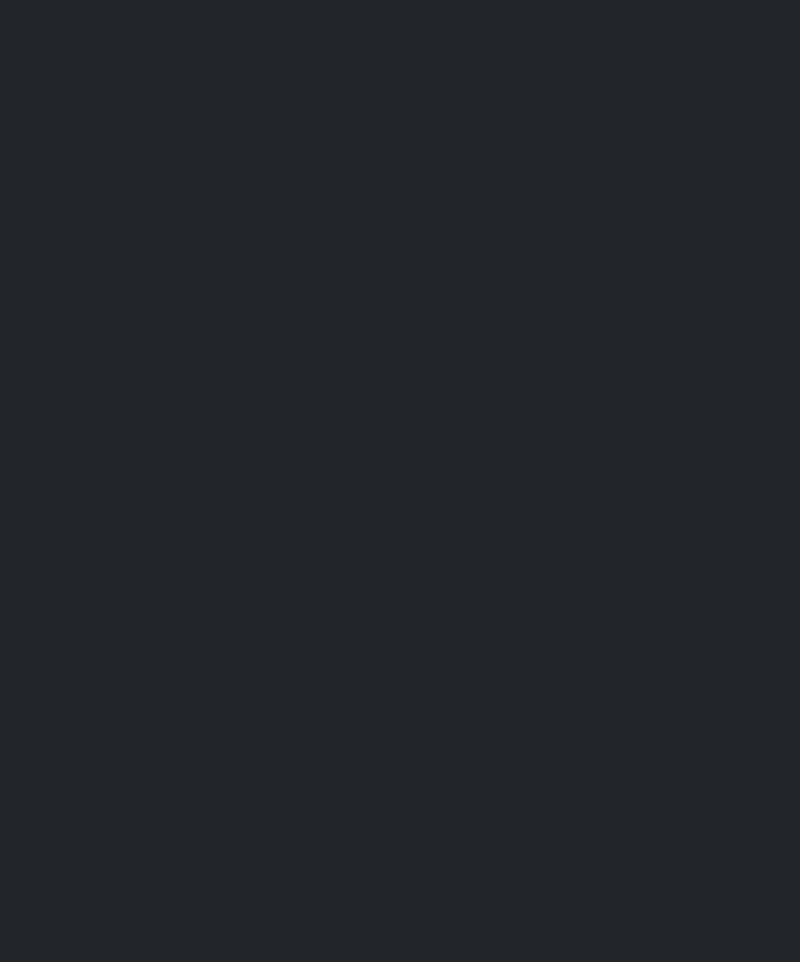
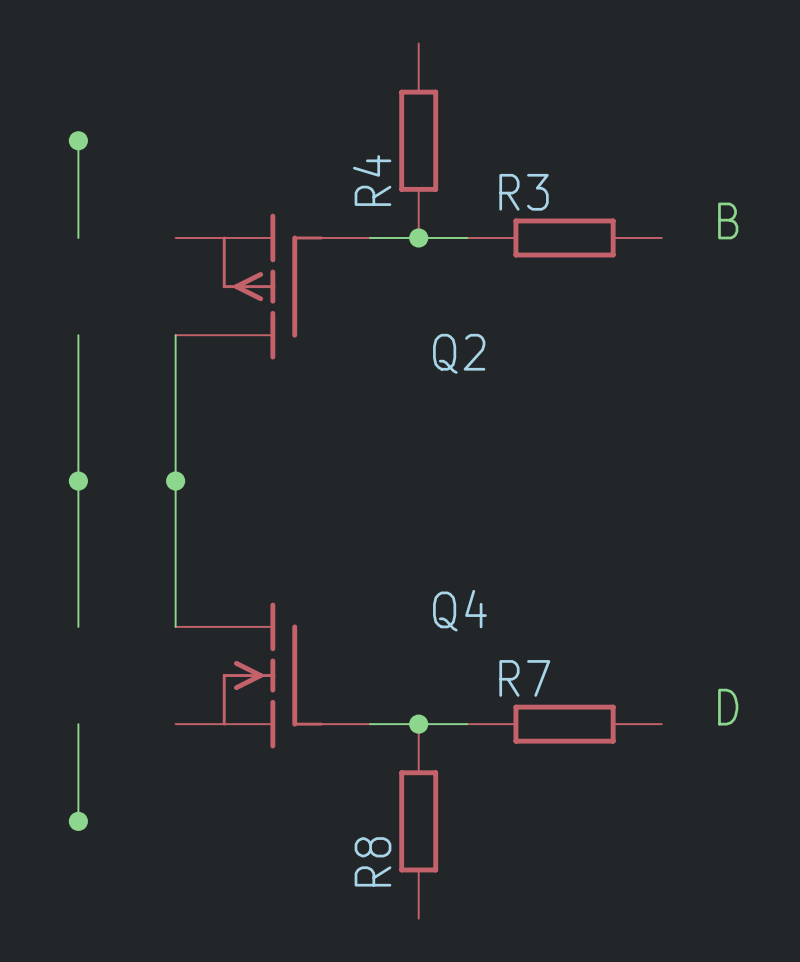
wire: none -> (78, 140) (78, 237)
junction: none -> (78, 140)
R4: none -> (418, 140)
text: none -> B (728, 220)
wire: none -> (370, 237) (467, 237)
junction: none -> (418, 237)
R3: none -> (564, 237)
Q2: none -> (272, 286)
wire: none -> (78, 335) (78, 626)
wire: none -> (175, 335) (175, 626)
junction: none -> (78, 481)
junction: none -> (175, 481)
Q4: none -> (272, 675)
text: none -> D (728, 707)
wire: none -> (78, 724) (78, 821)
wire: none -> (370, 724) (467, 724)
junction: none -> (418, 724)
R7: none -> (564, 724)
junction: none -> (78, 821)
R8: none -> (418, 821)

